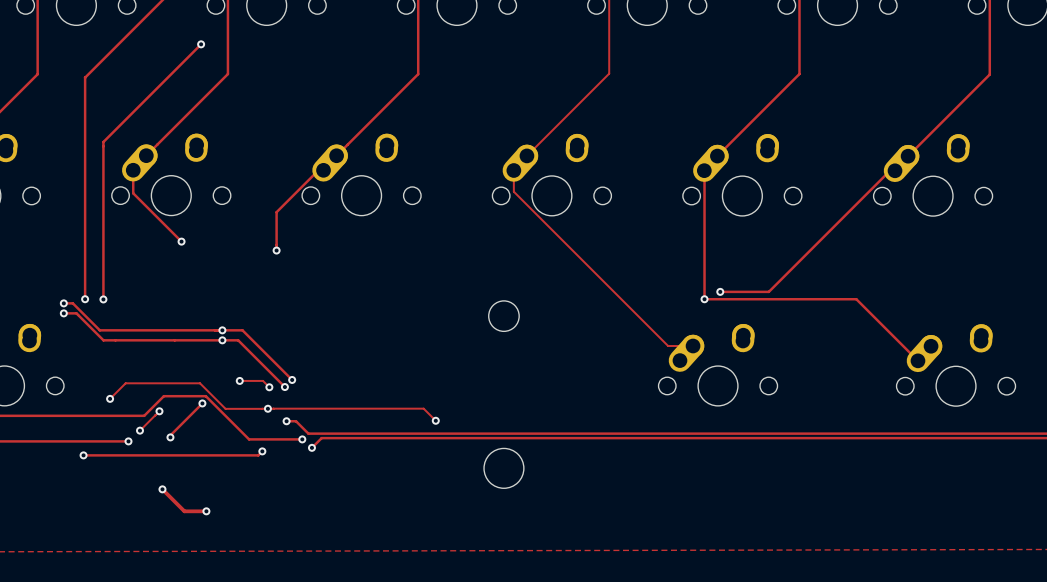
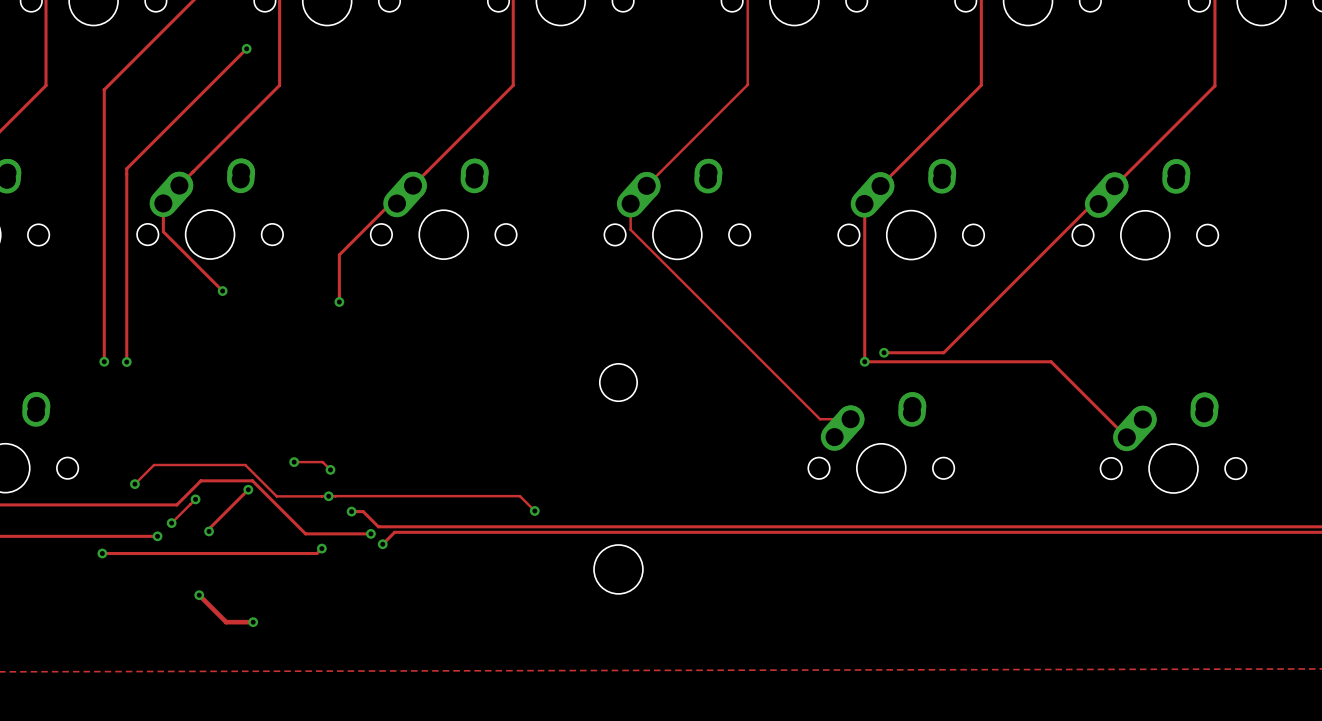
track: (63, 303) (72, 303) (99, 330) (242, 330) (292, 379) -> none
via: (63, 303) -> none
track: (63, 313) (76, 313) (103, 340) (238, 340) (284, 387) -> none
via: (63, 313) -> none
via: (222, 330) -> none
via: (222, 340) -> none
via: (292, 379) -> none
via: (284, 387) -> none

